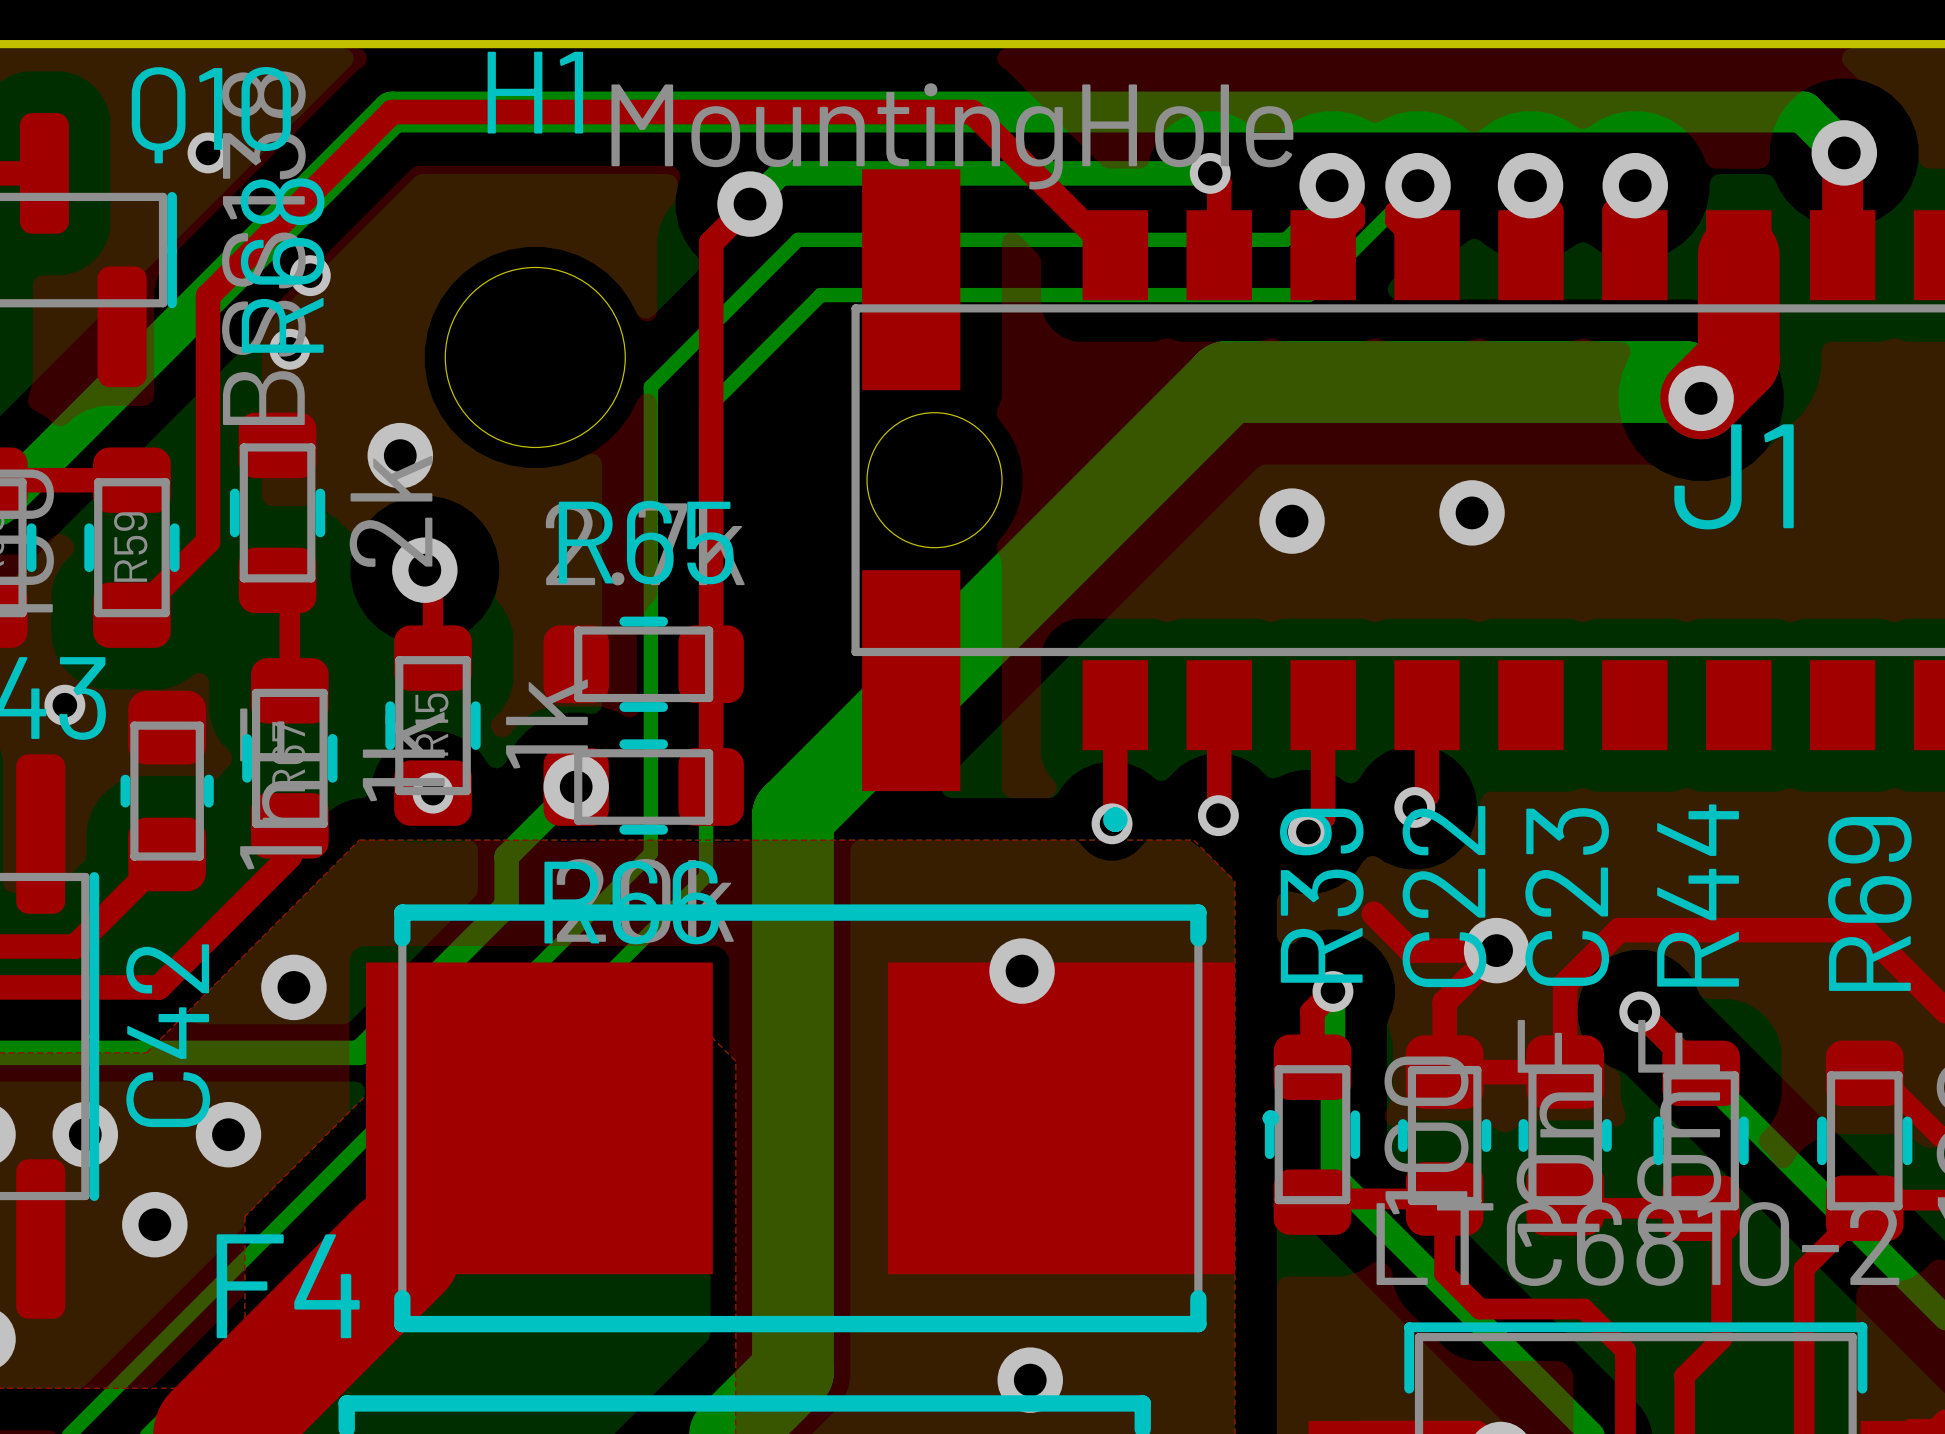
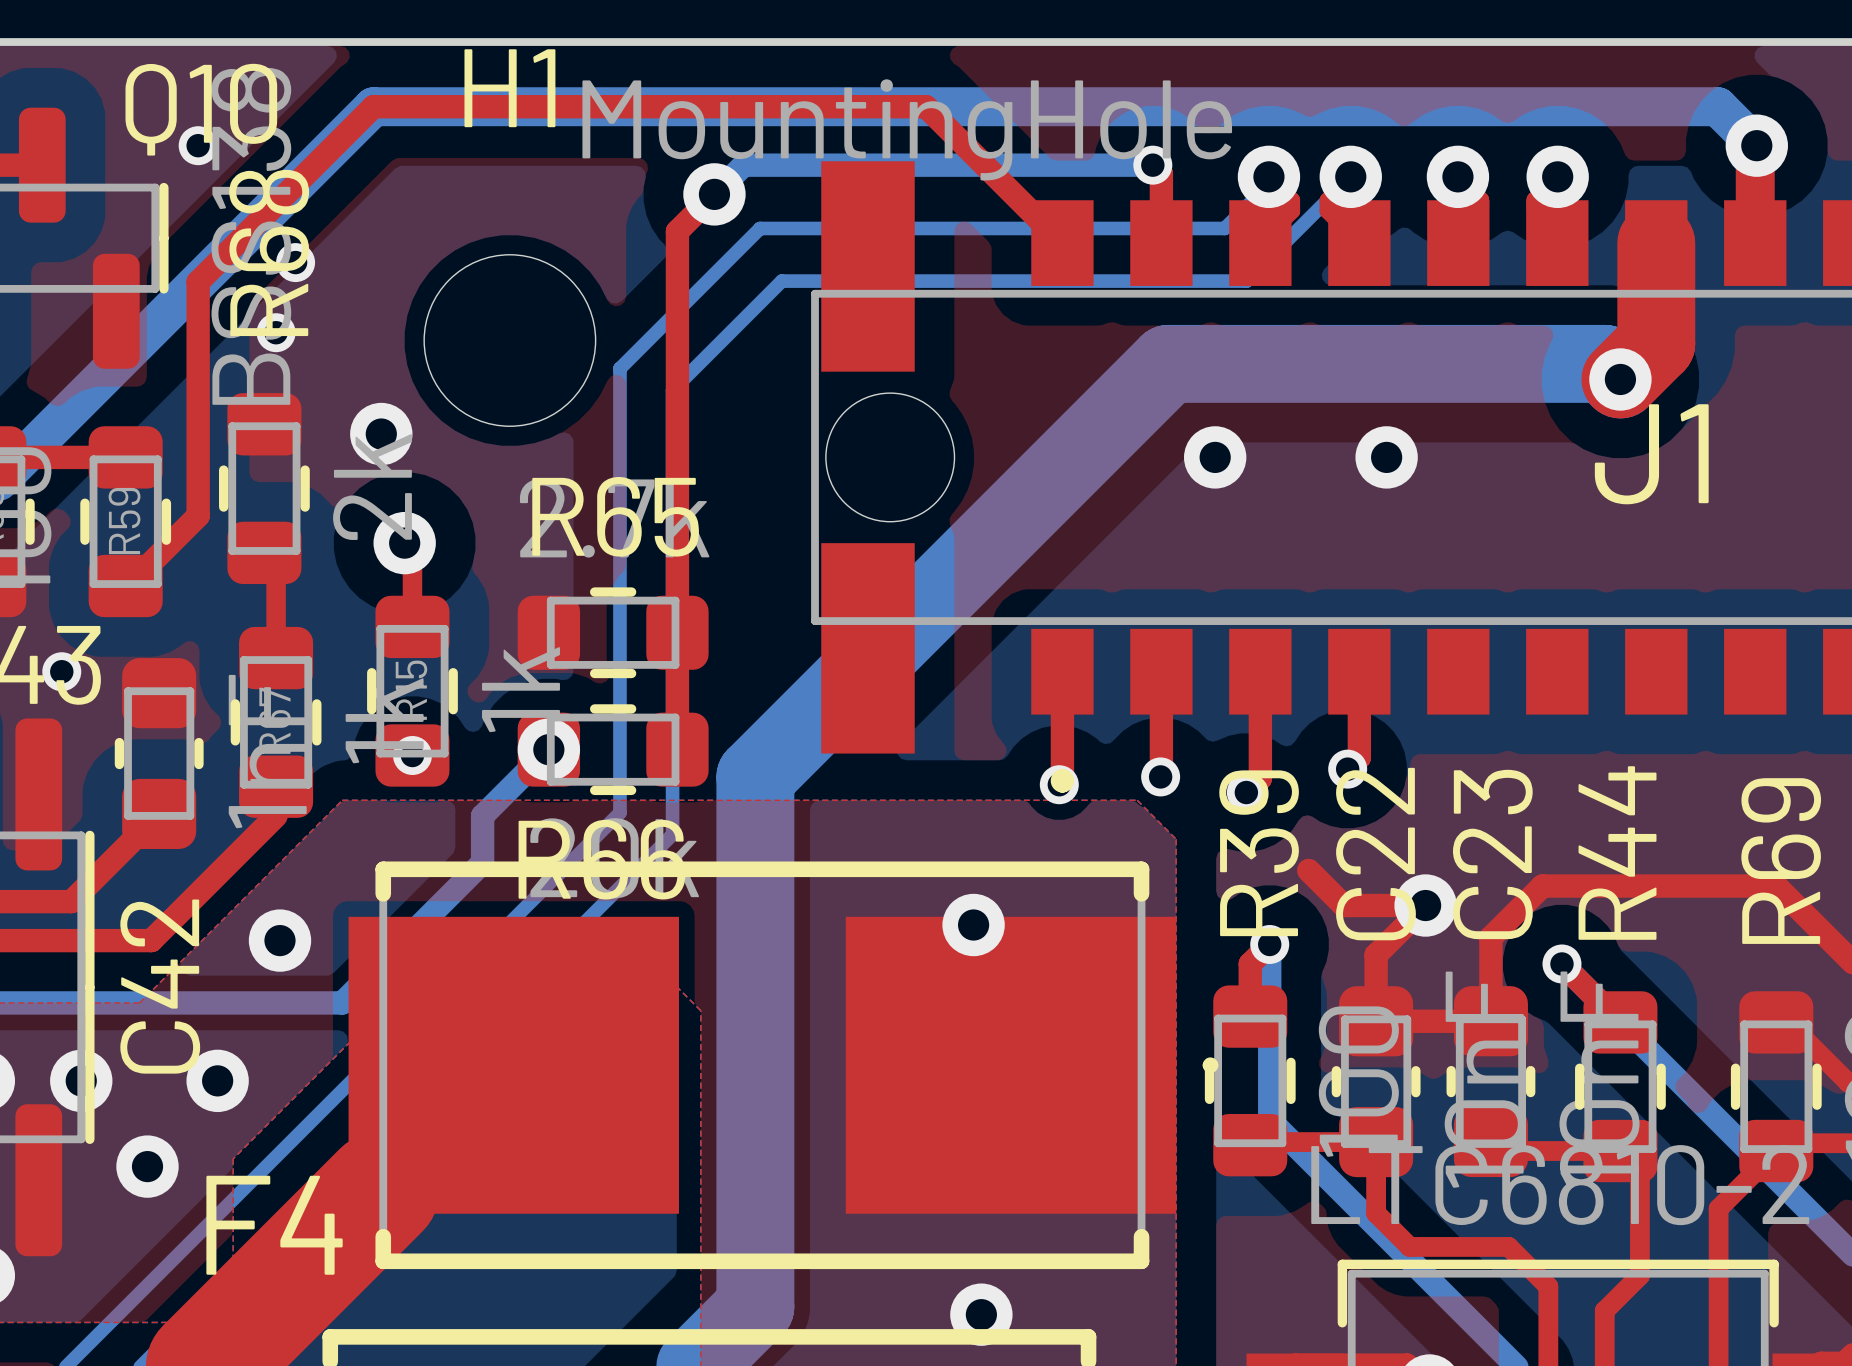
via position: (1472, 512) -> (1386, 457)
via position: (1292, 521) -> (1215, 457)

